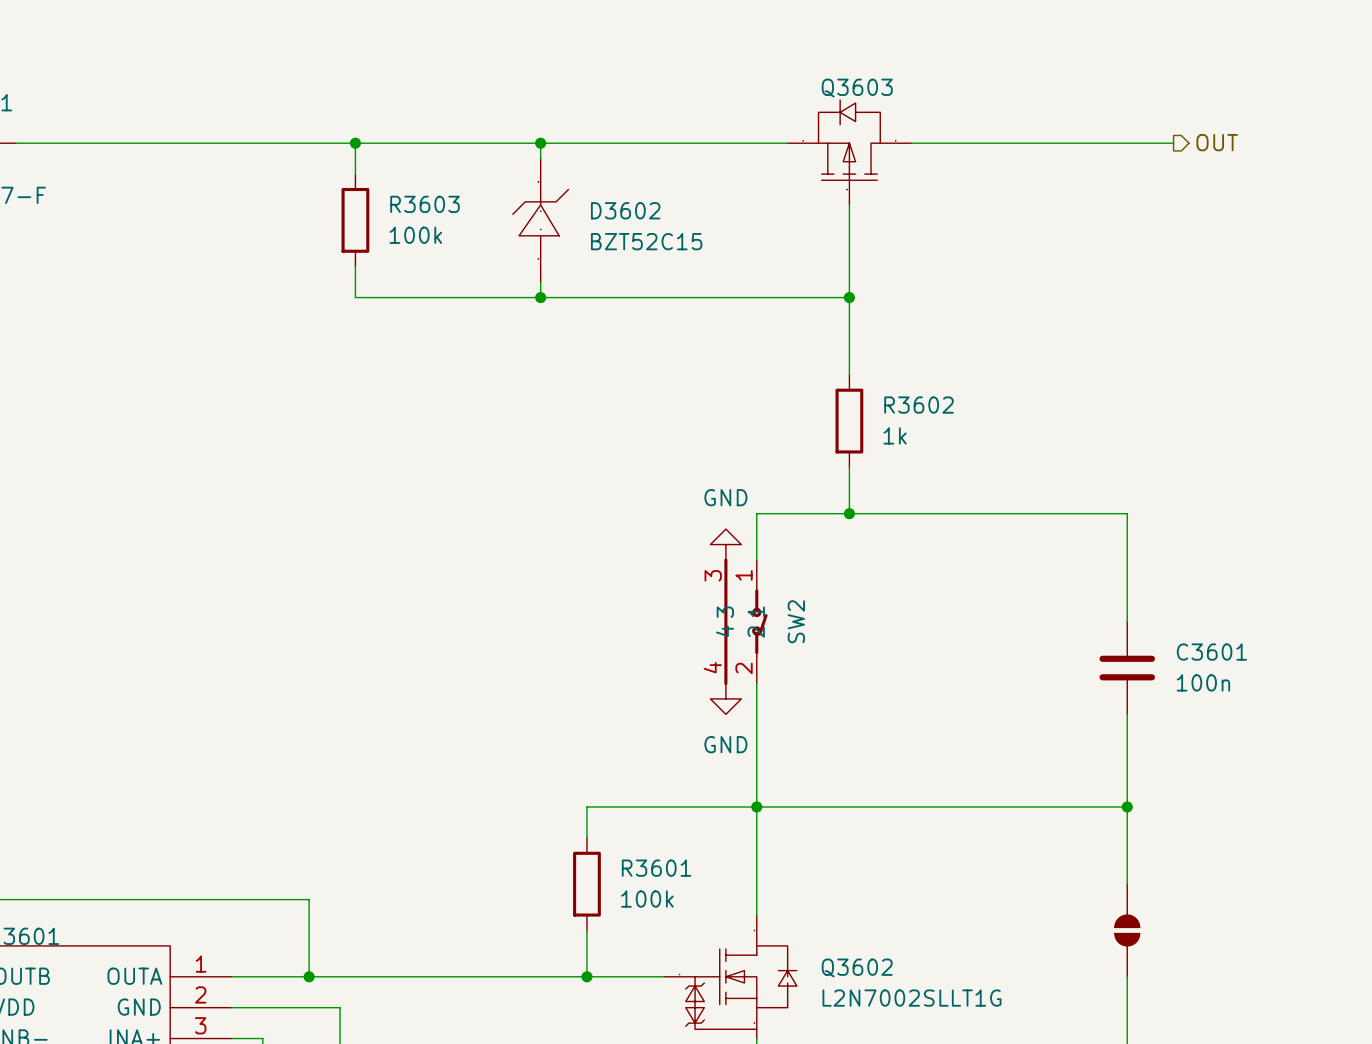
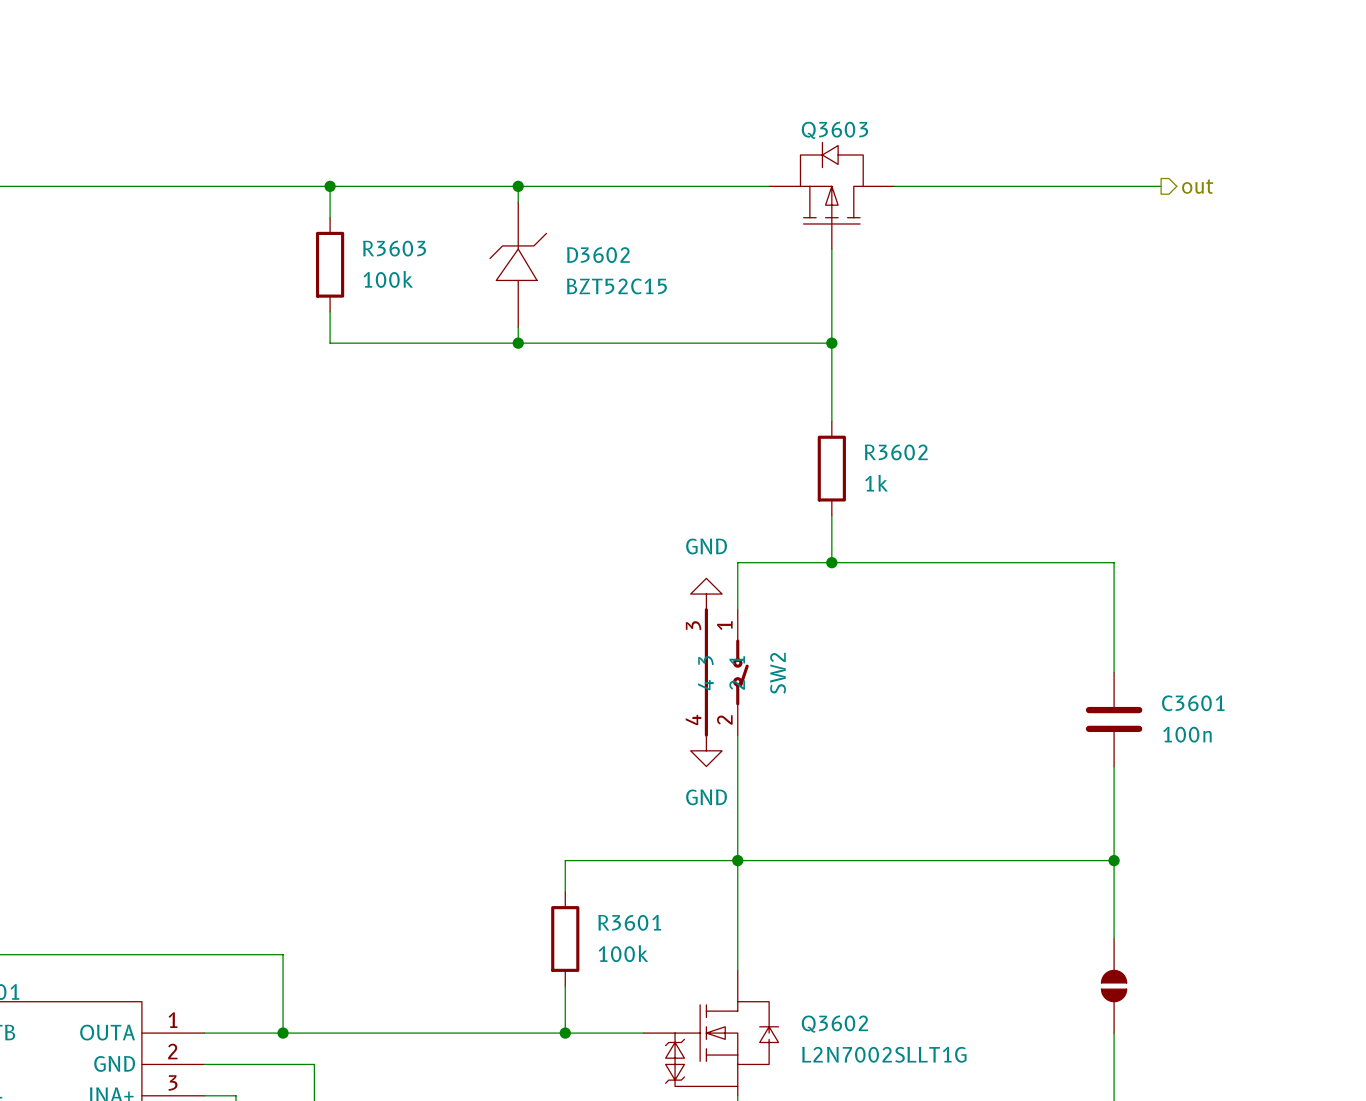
hierarchical label: OUT (1217, 142) -> out (1197, 186)

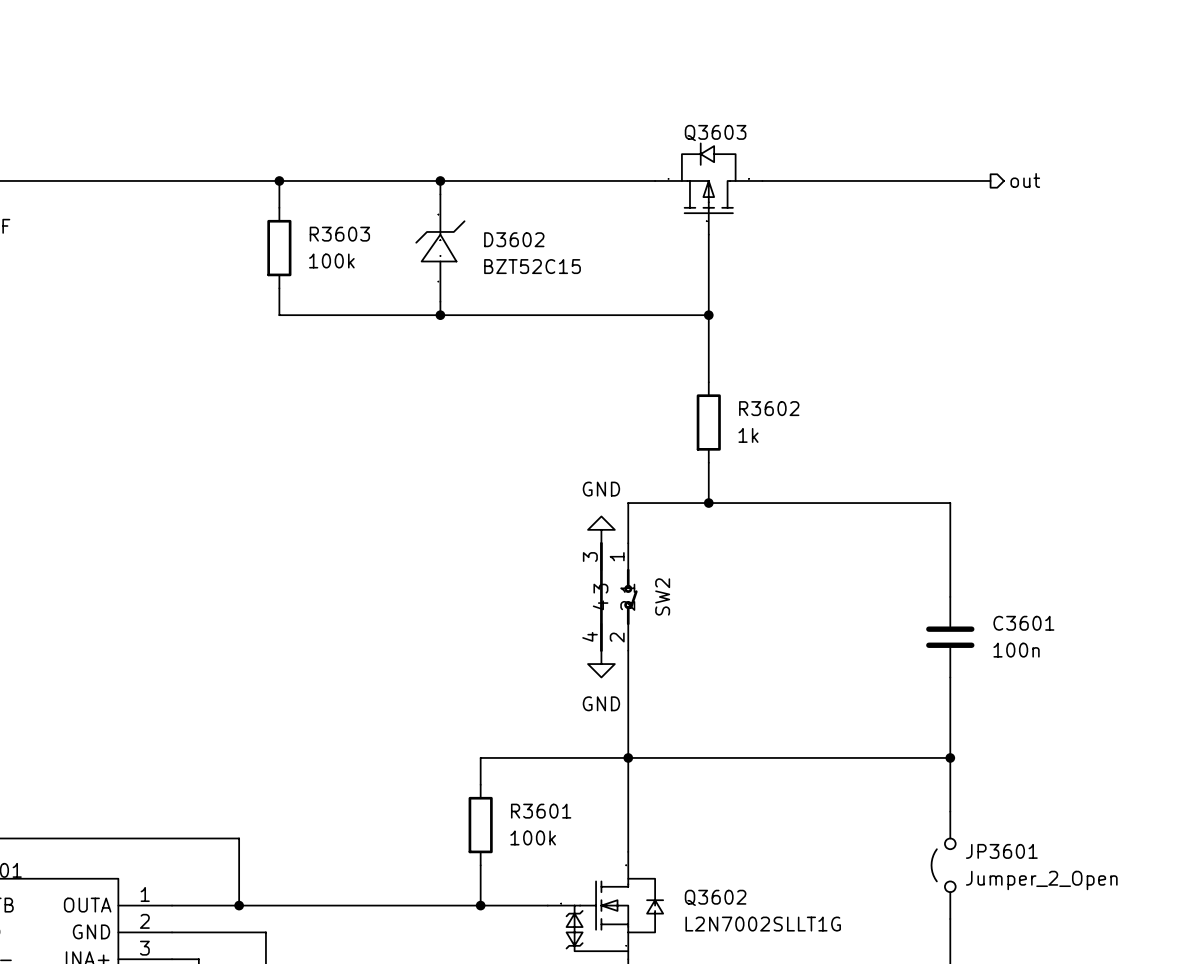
JP3601: none -> Jumper_2_Open (943, 865)
part: (1114, 986) -> none

